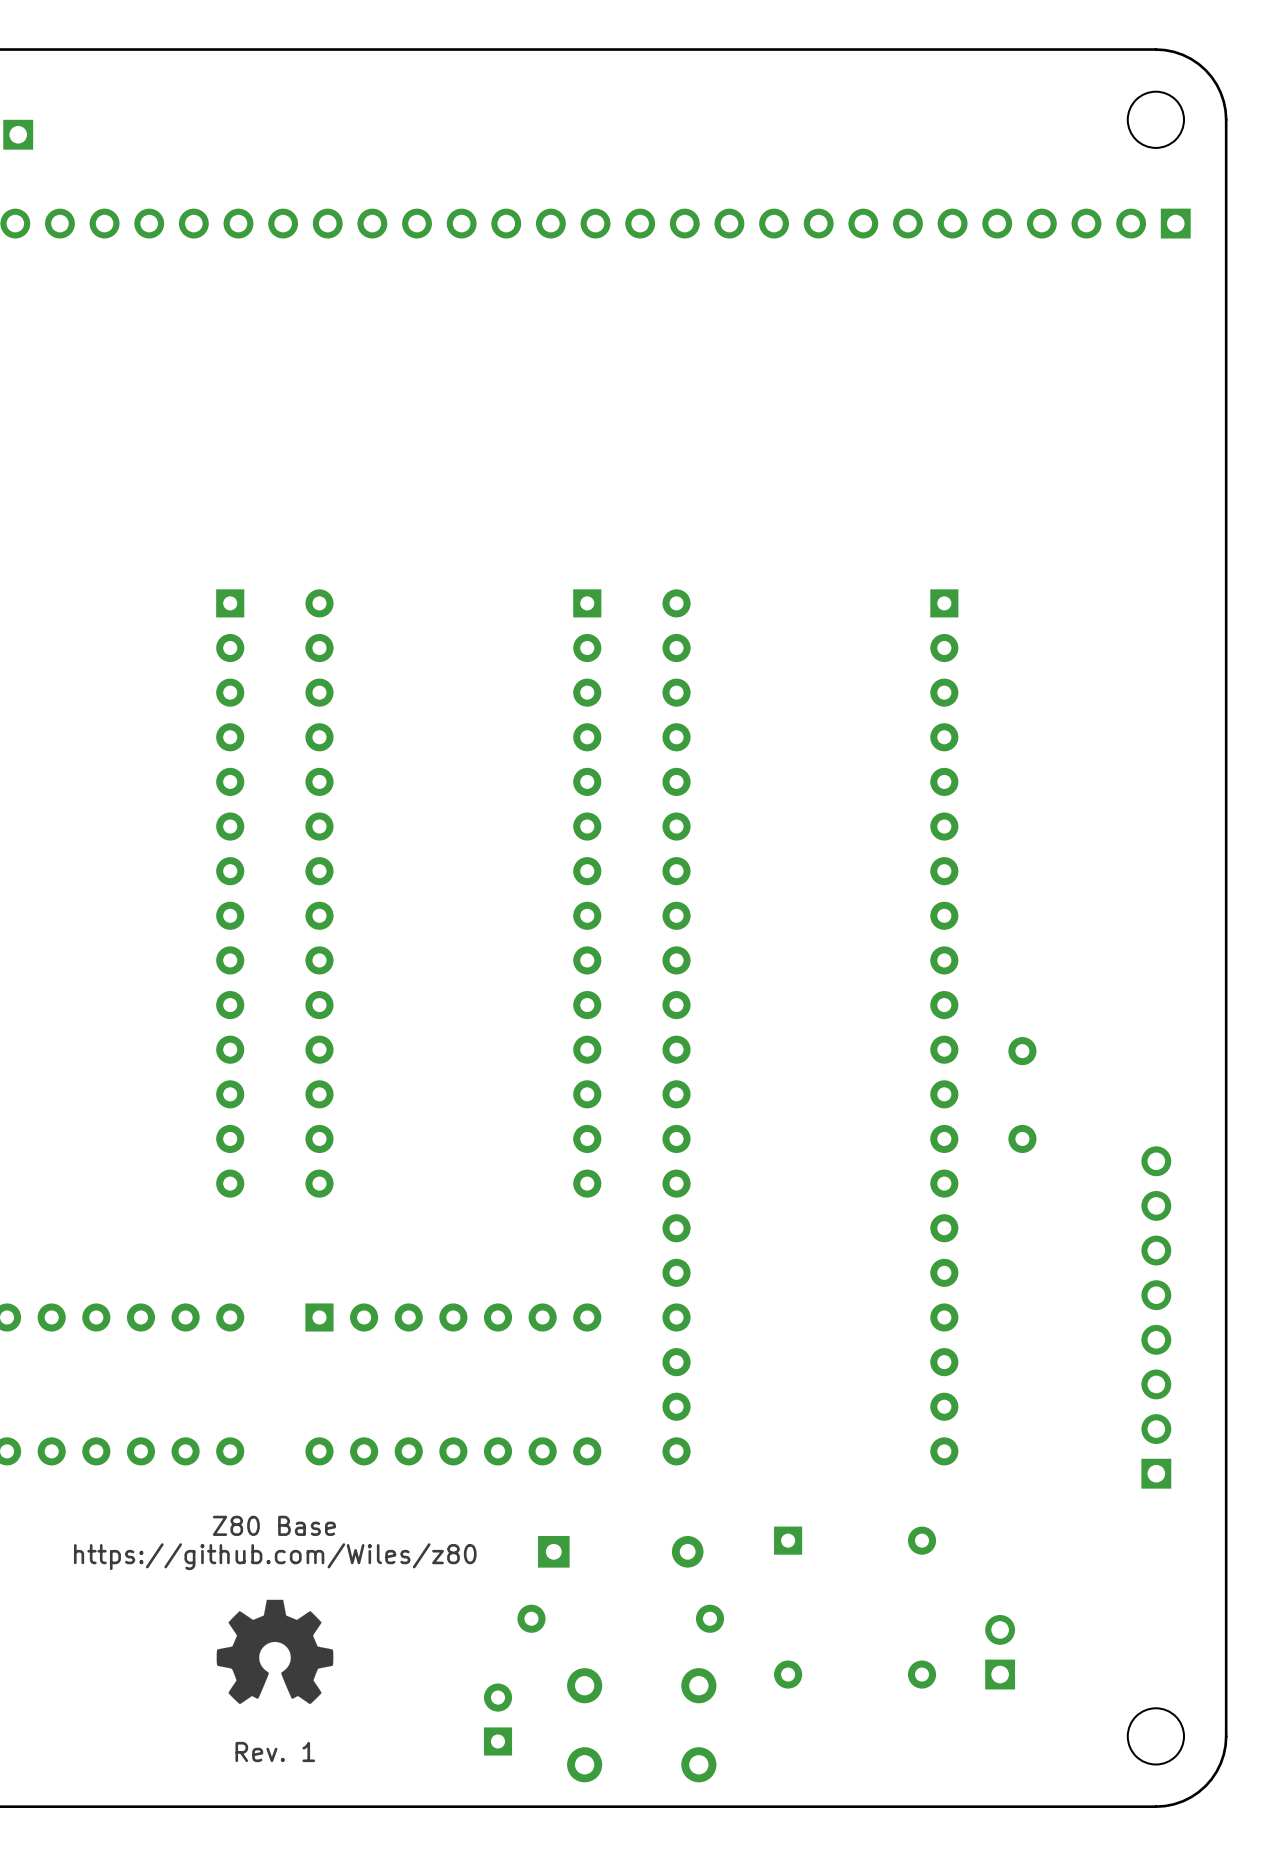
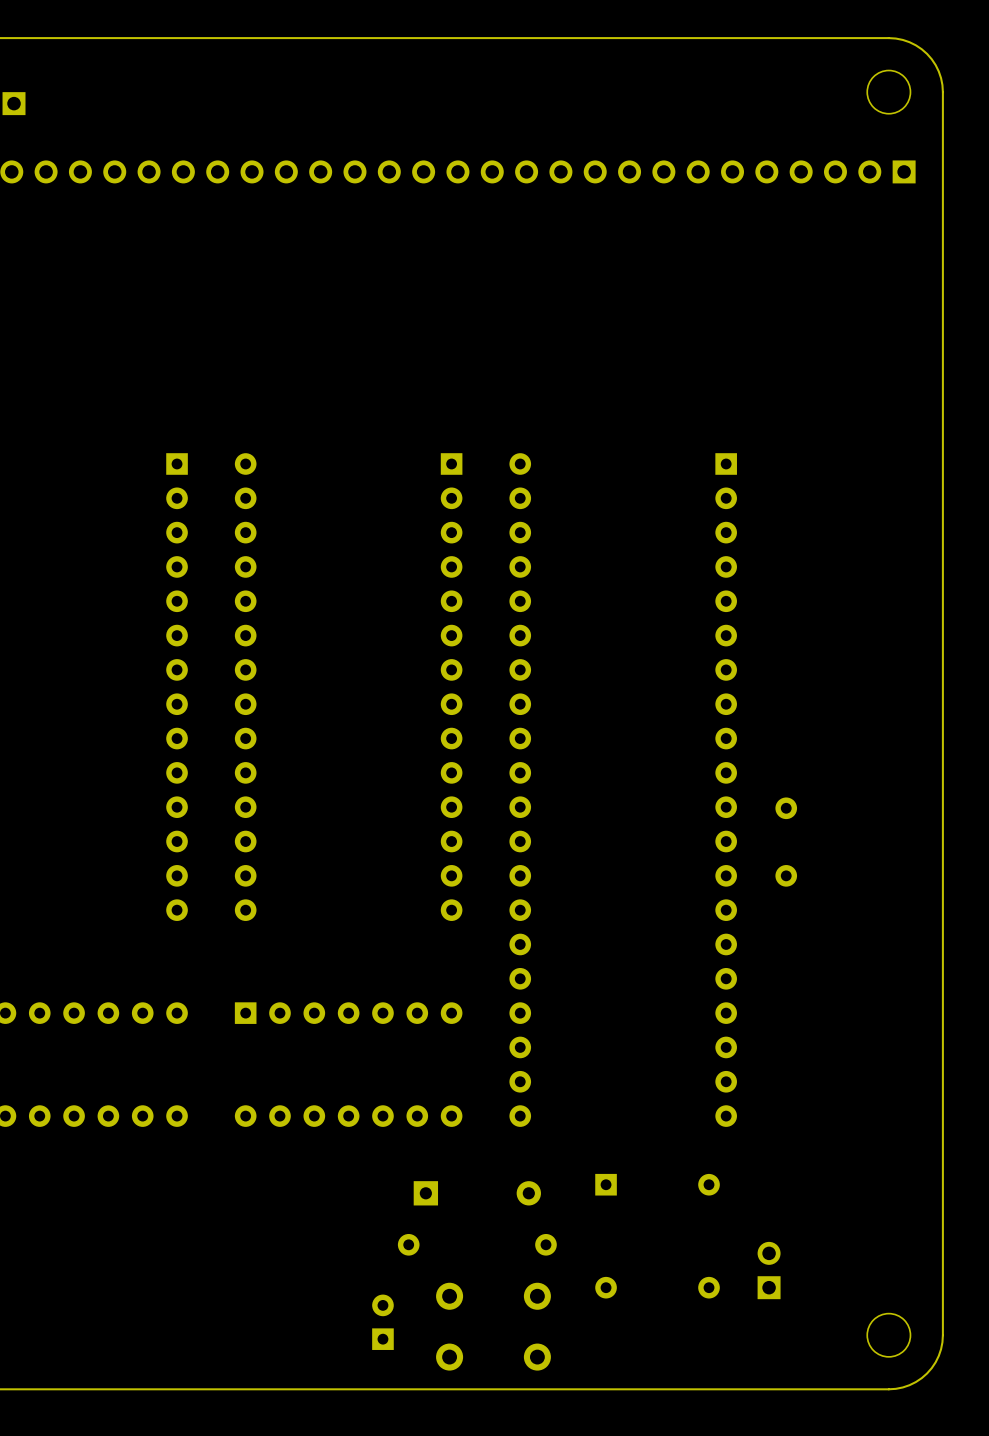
part: (1156, 1317) -> none
text: Z80 Base (274, 1525) -> none
text: https://github.com/Wiles/z80 (275, 1556) -> none
drawing: [216, 1599, 334, 1705] -> none
text: Rev. 1 (275, 1751) -> none

